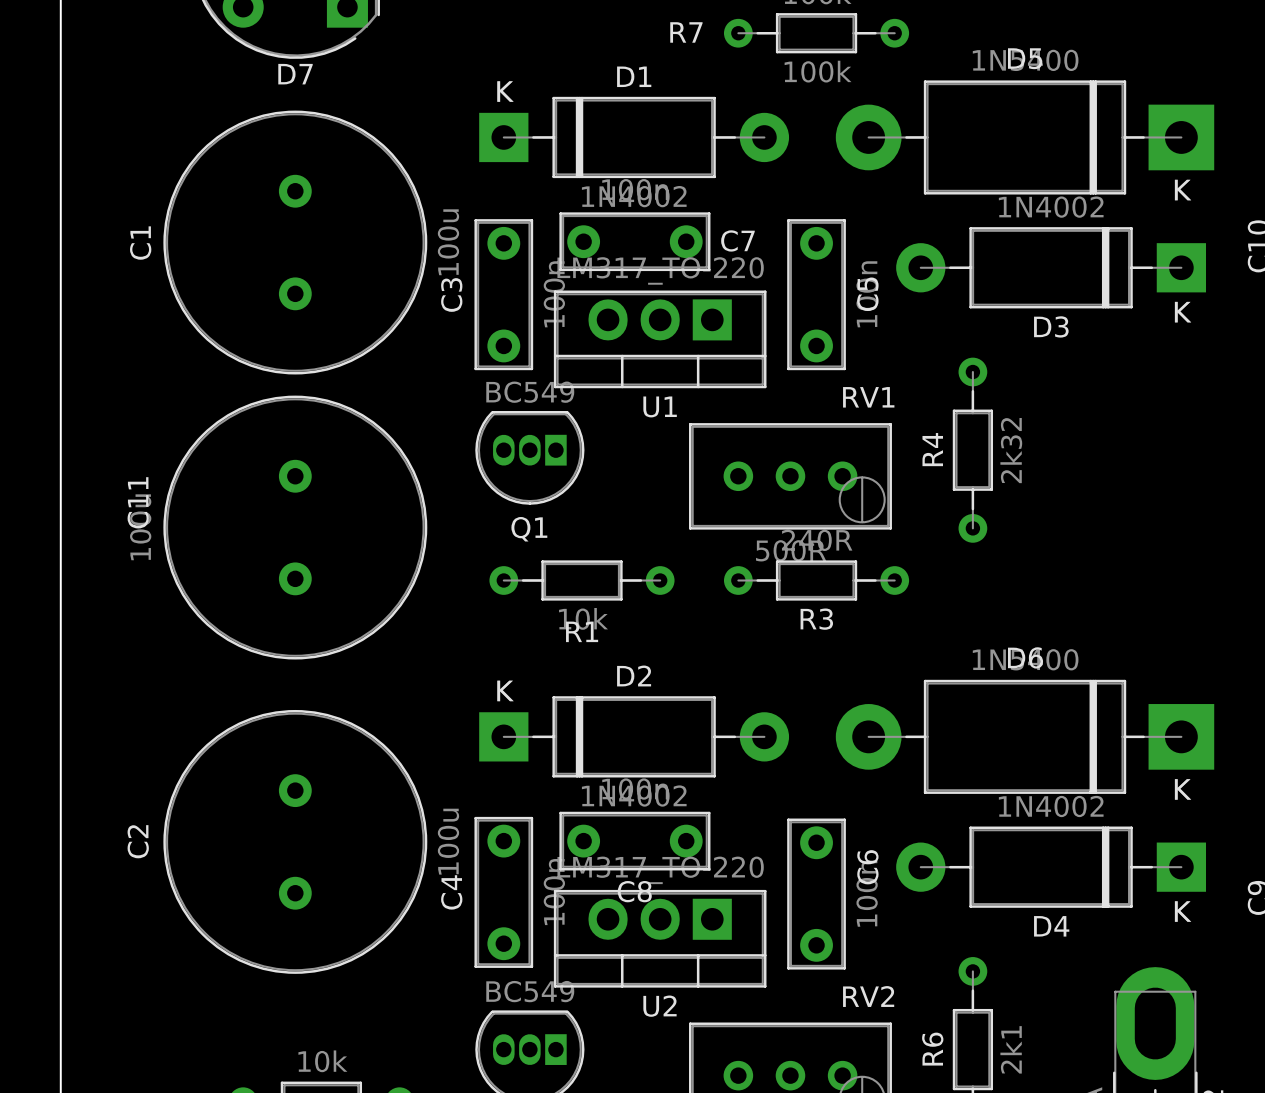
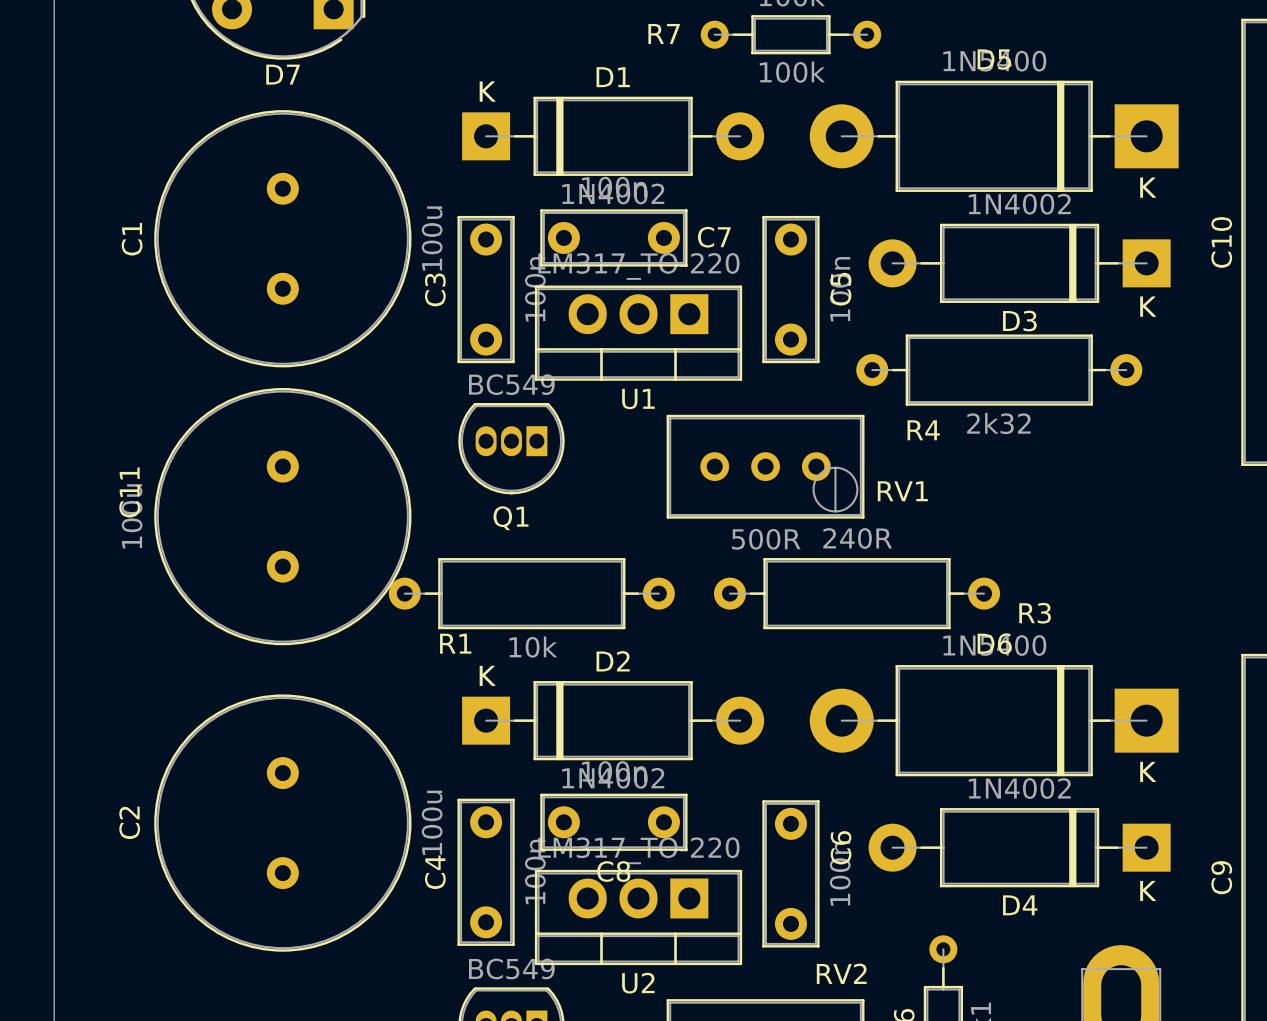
R4 footprint: [952, 357, 994, 543] -> [856, 334, 1143, 406]
RV1 name position: RV1 (868, 397) -> RV1 (902, 491)
R4 name position: R4 (932, 449) -> R4 (923, 430)
R4 value position: 2k32 (1011, 450) -> 2k32 (998, 423)
R1 footprint: [489, 560, 675, 601] -> [388, 558, 675, 630]
R3 footprint: [723, 560, 910, 601] -> [713, 558, 1001, 630]
R3 name position: R3 (816, 619) -> R3 (1035, 613)
R1 name position: R1 (582, 631) -> R1 (455, 643)

